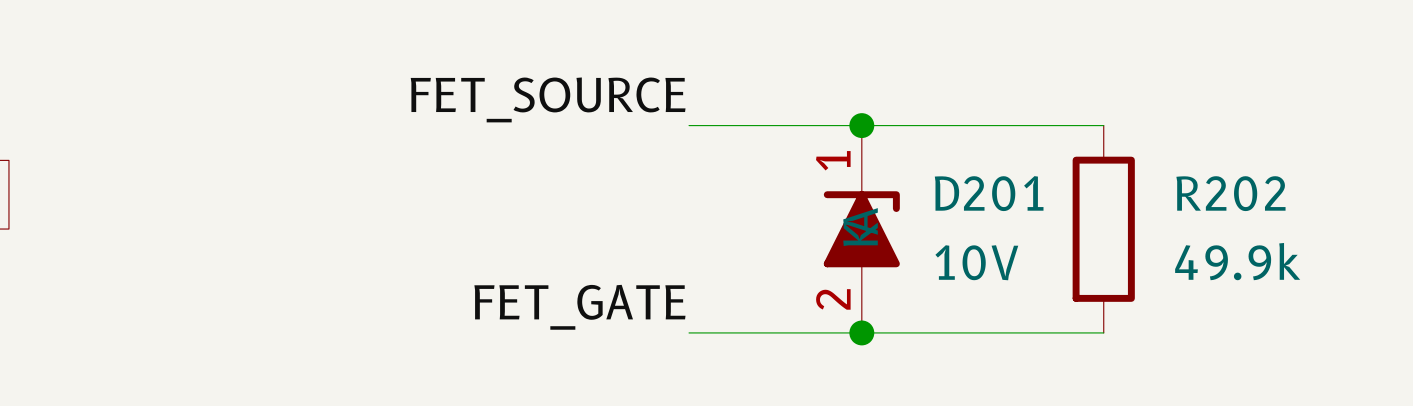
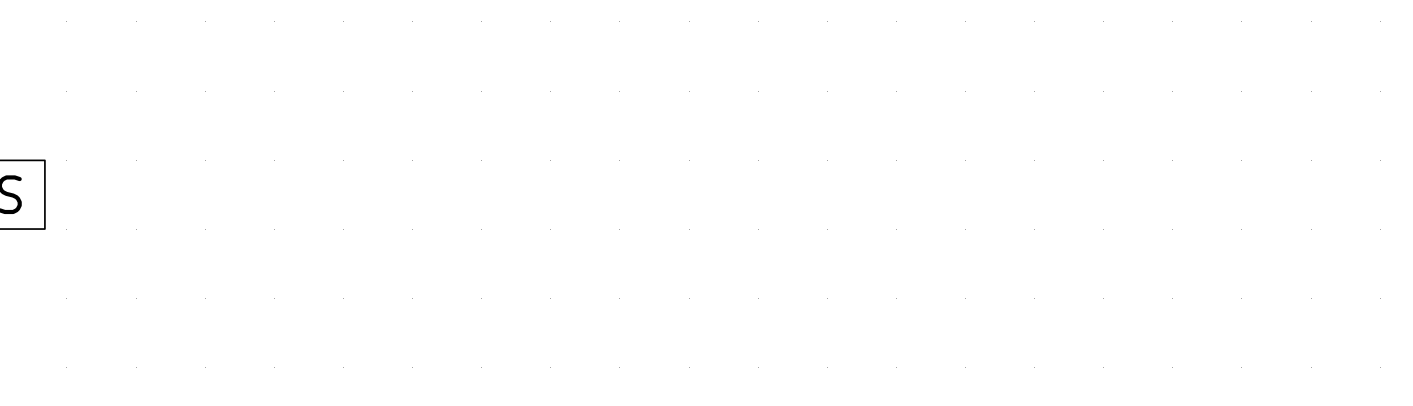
label: FET_SOURCE (548, 99) -> none
wire: (689, 125) (1103, 125) -> none
junction: (861, 125) -> none
D201: 10V (861, 229) -> none
R202: 49.9k (1103, 229) -> none
label: FET_GATE (579, 307) -> none
wire: (689, 332) (1103, 332) -> none
junction: (861, 332) -> none

